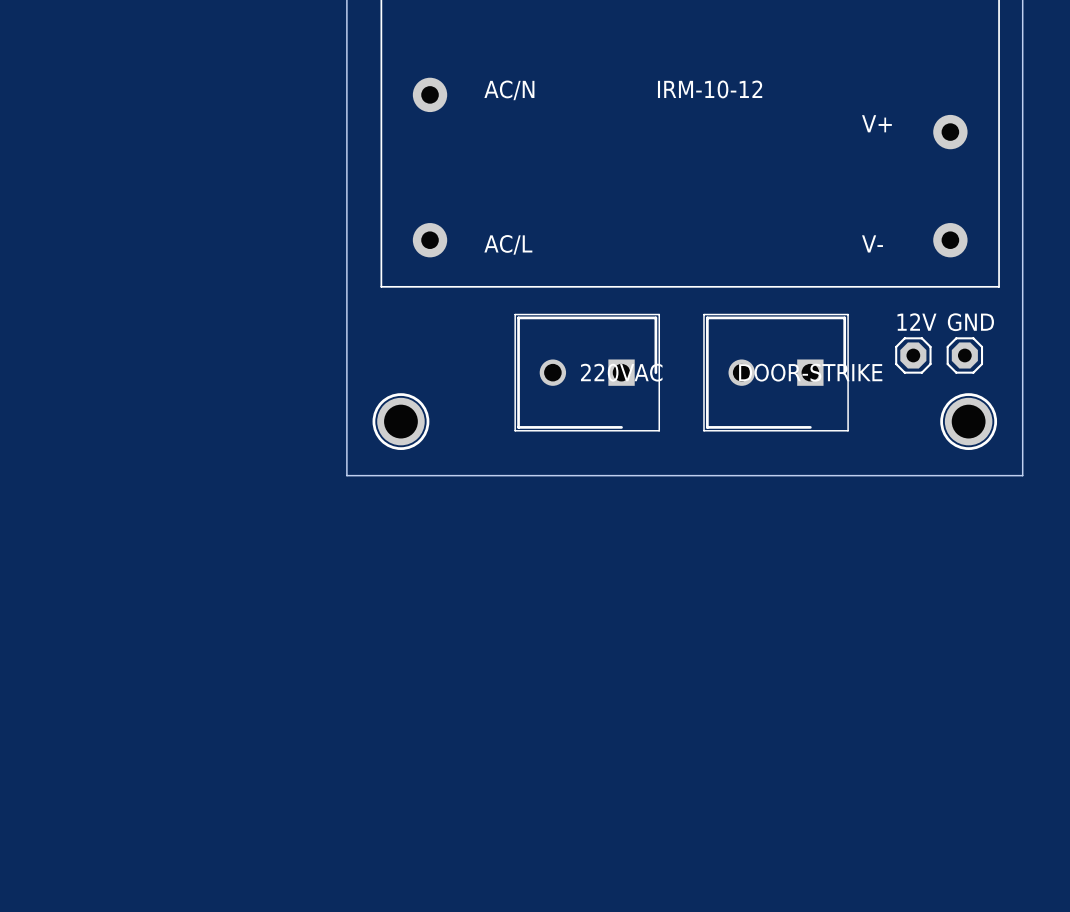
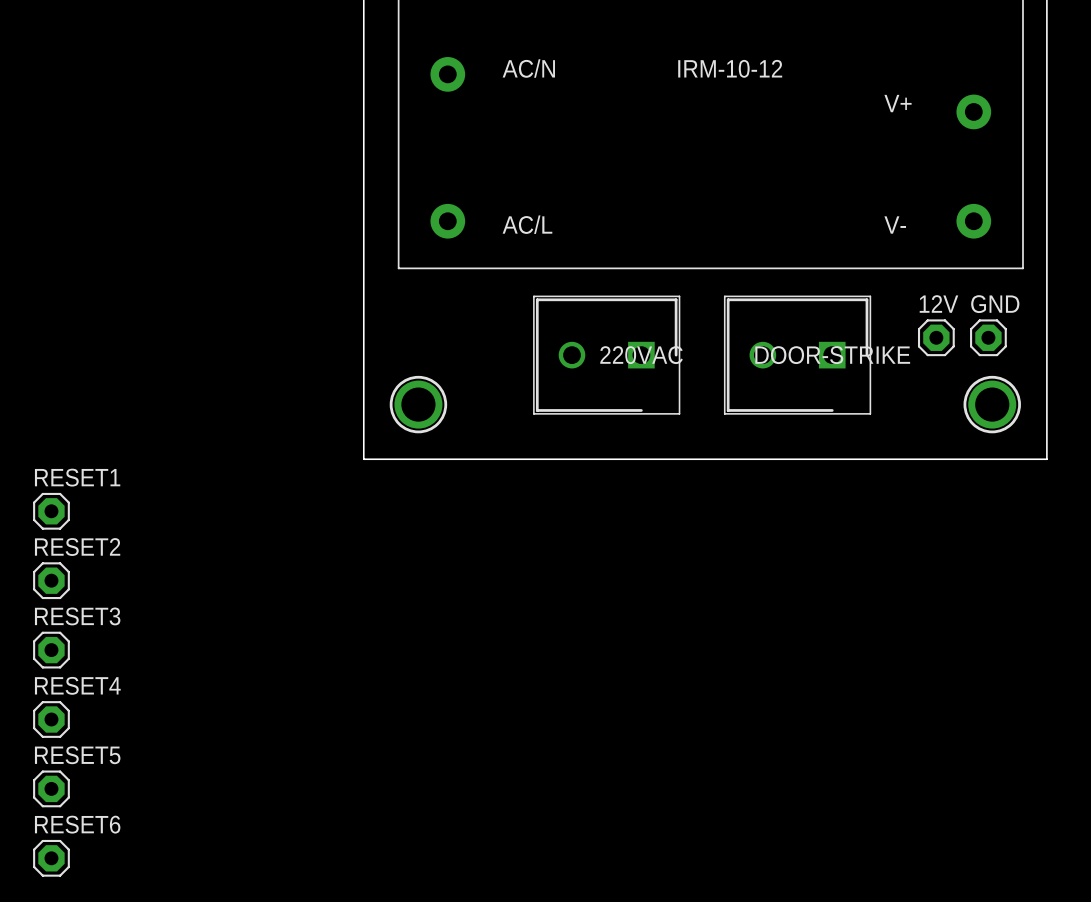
RESET1: none -> (51, 511)
RESET2: none -> (51, 580)
RESET3: none -> (51, 650)
RESET4: none -> (51, 719)
RESET5: none -> (51, 788)
RESET6: none -> (51, 858)

